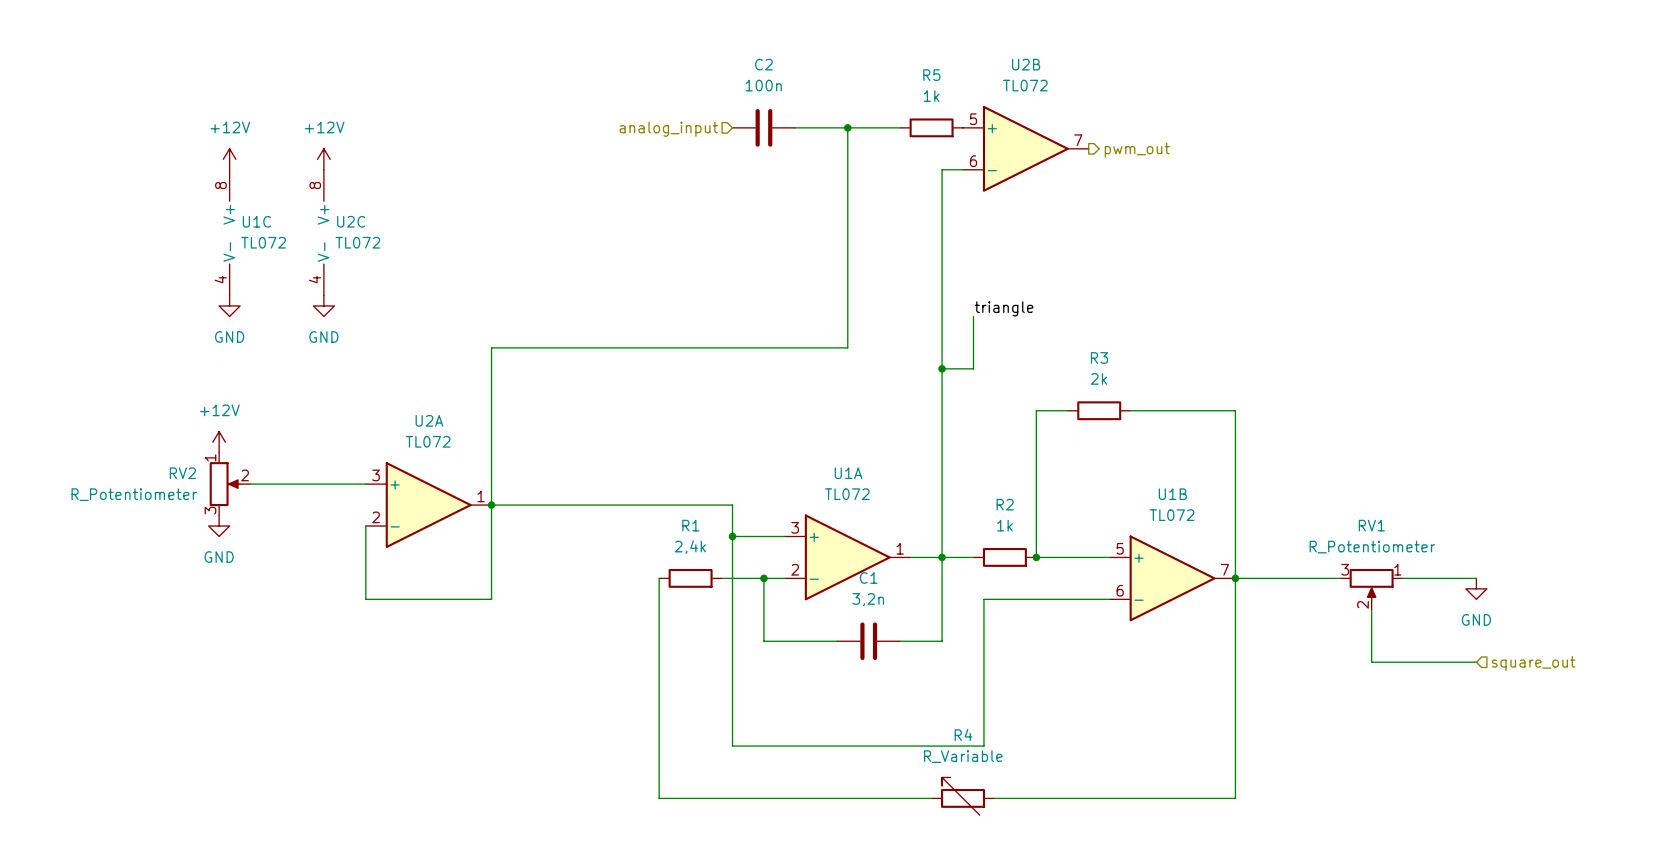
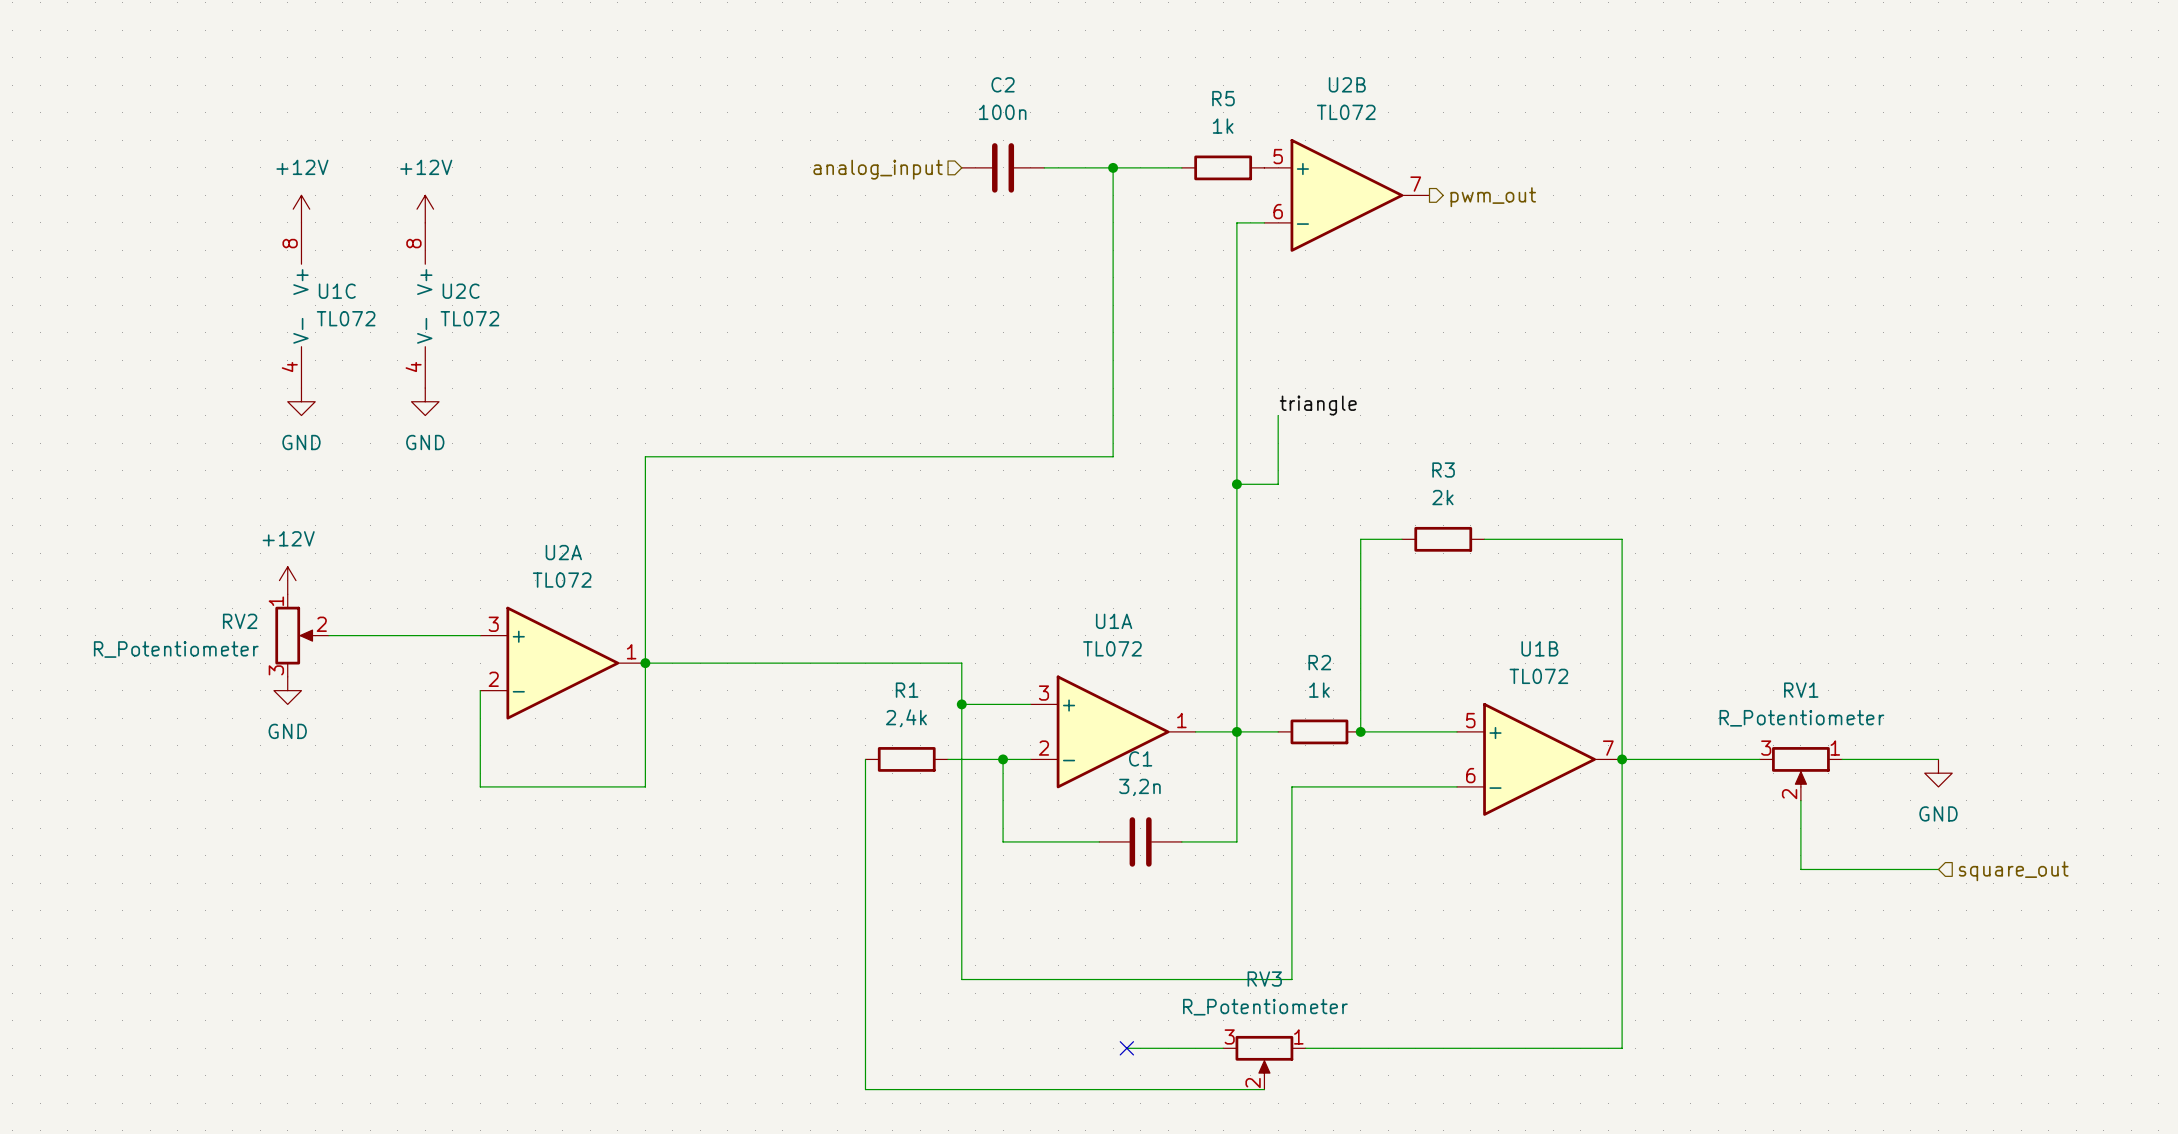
R4: R_Variable (963, 796) -> none
wire: (659, 798) (858, 798) -> (865, 1048) (865, 1089) (1264, 1089)
no-connect mark: none -> (1126, 1048)
RV3: none -> R_Potentiometer (1264, 1062)

